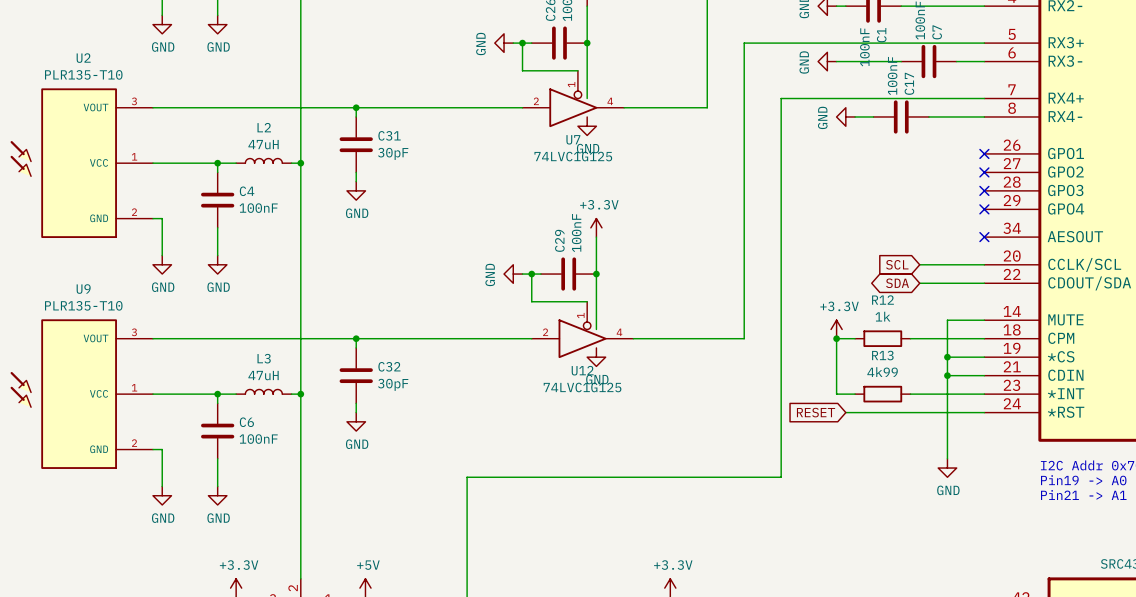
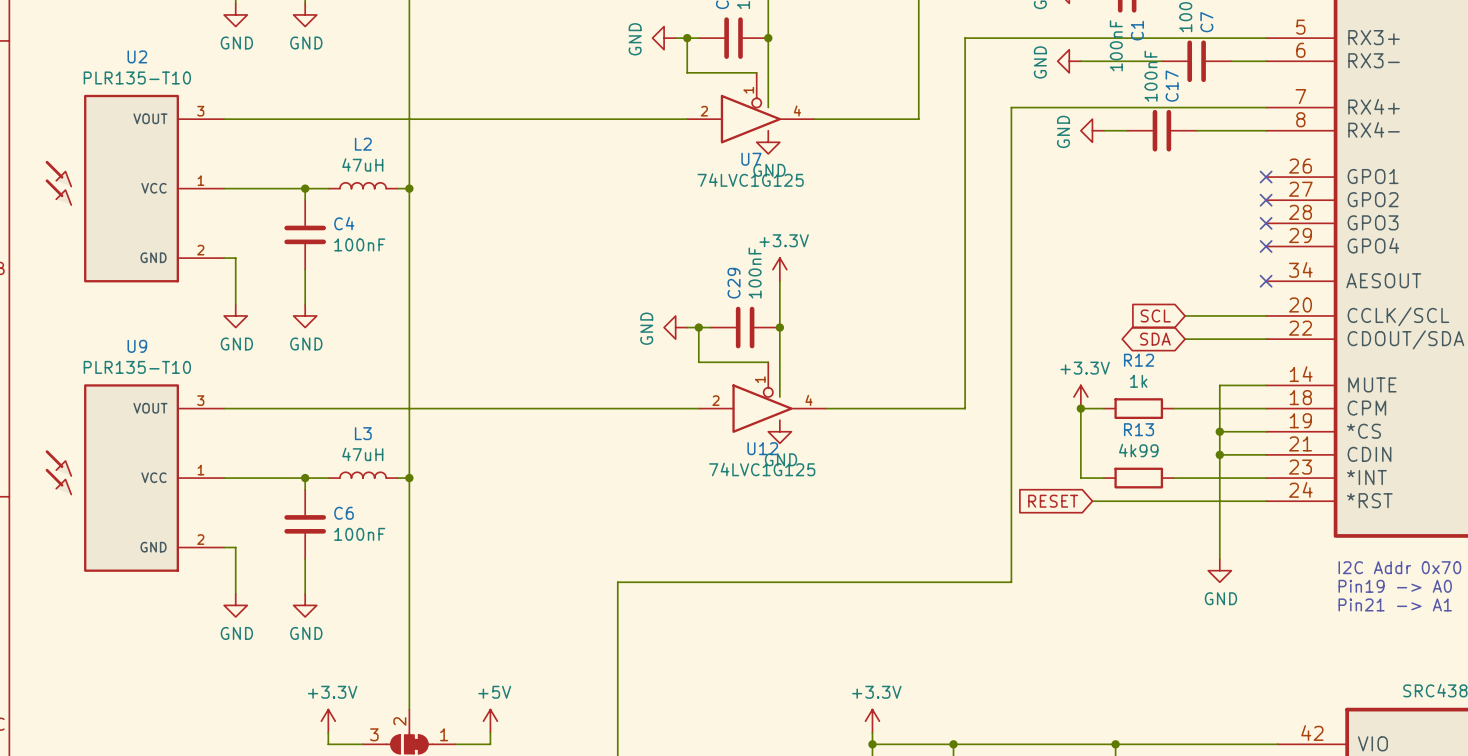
wire: (356, 107) (356, 116) -> none
junction: (356, 107) -> none
C31: 30pF (356, 144) -> none
wire: (356, 172) (356, 181) -> none
power symbol: GND (356, 190) -> none
wire: (356, 338) (356, 347) -> none
junction: (356, 338) -> none
C32: 30pF (356, 375) -> none
wire: (356, 403) (356, 412) -> none
power symbol: GND (356, 421) -> none

